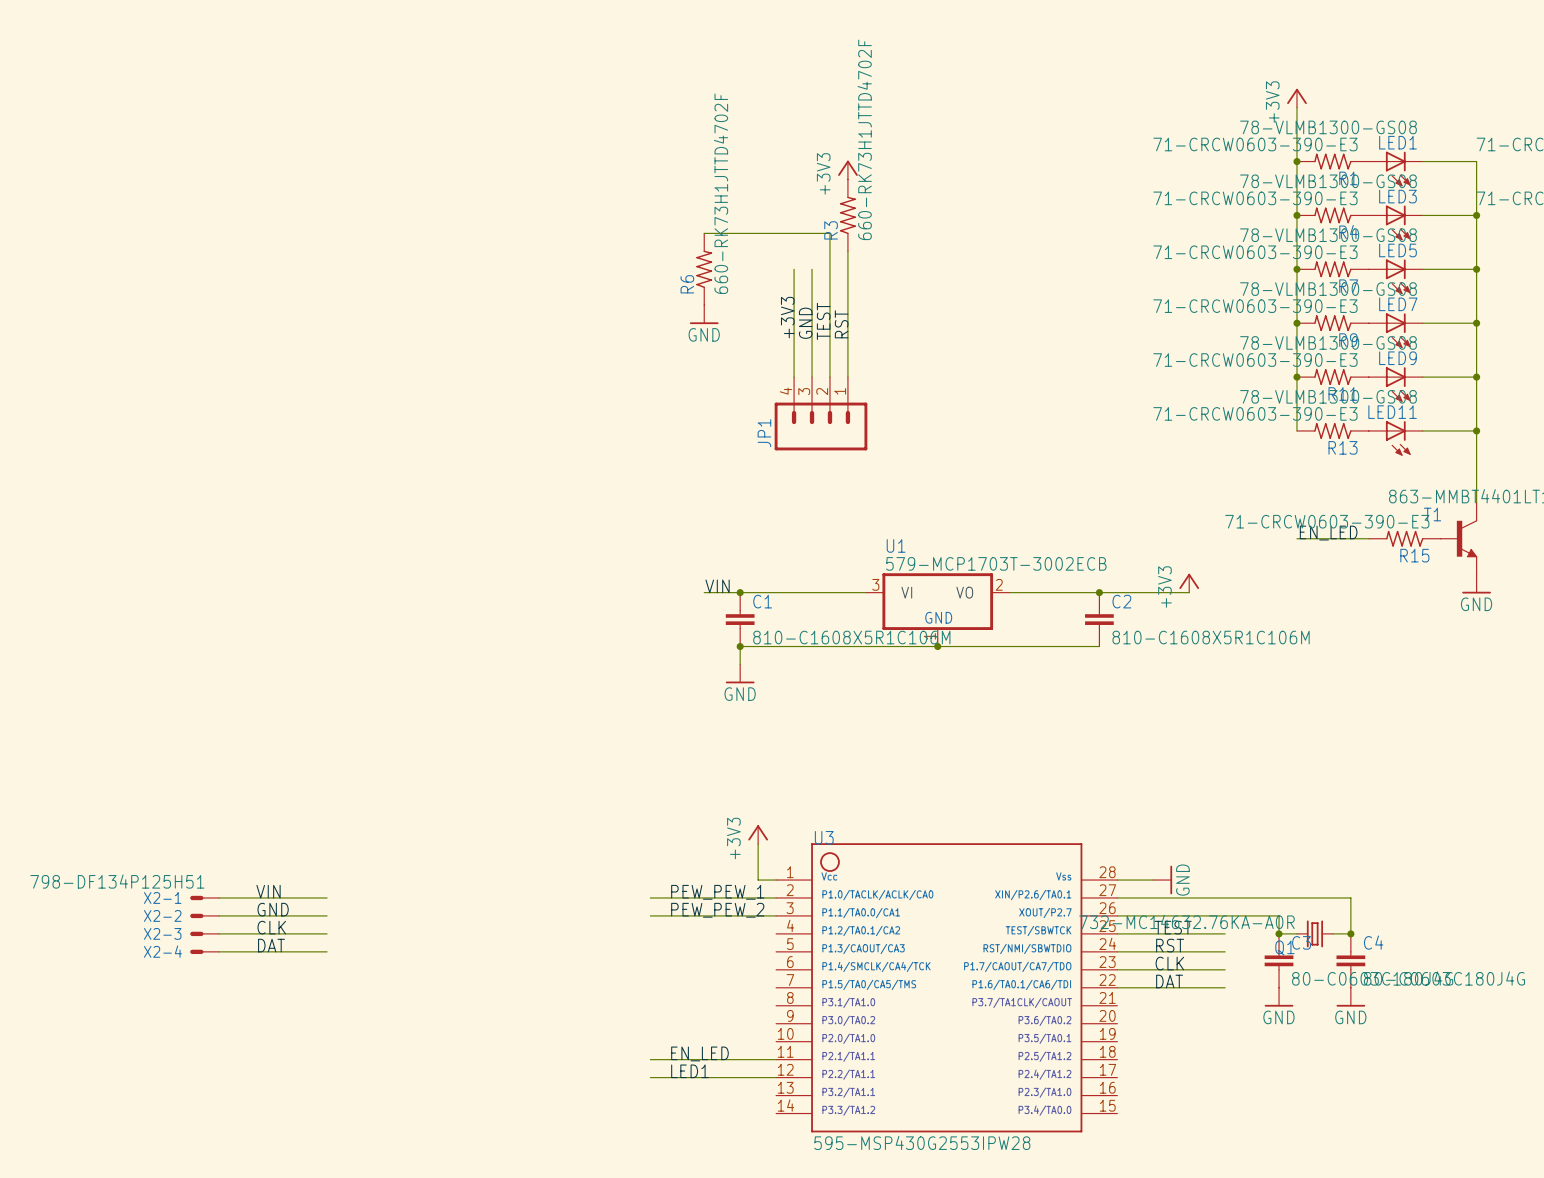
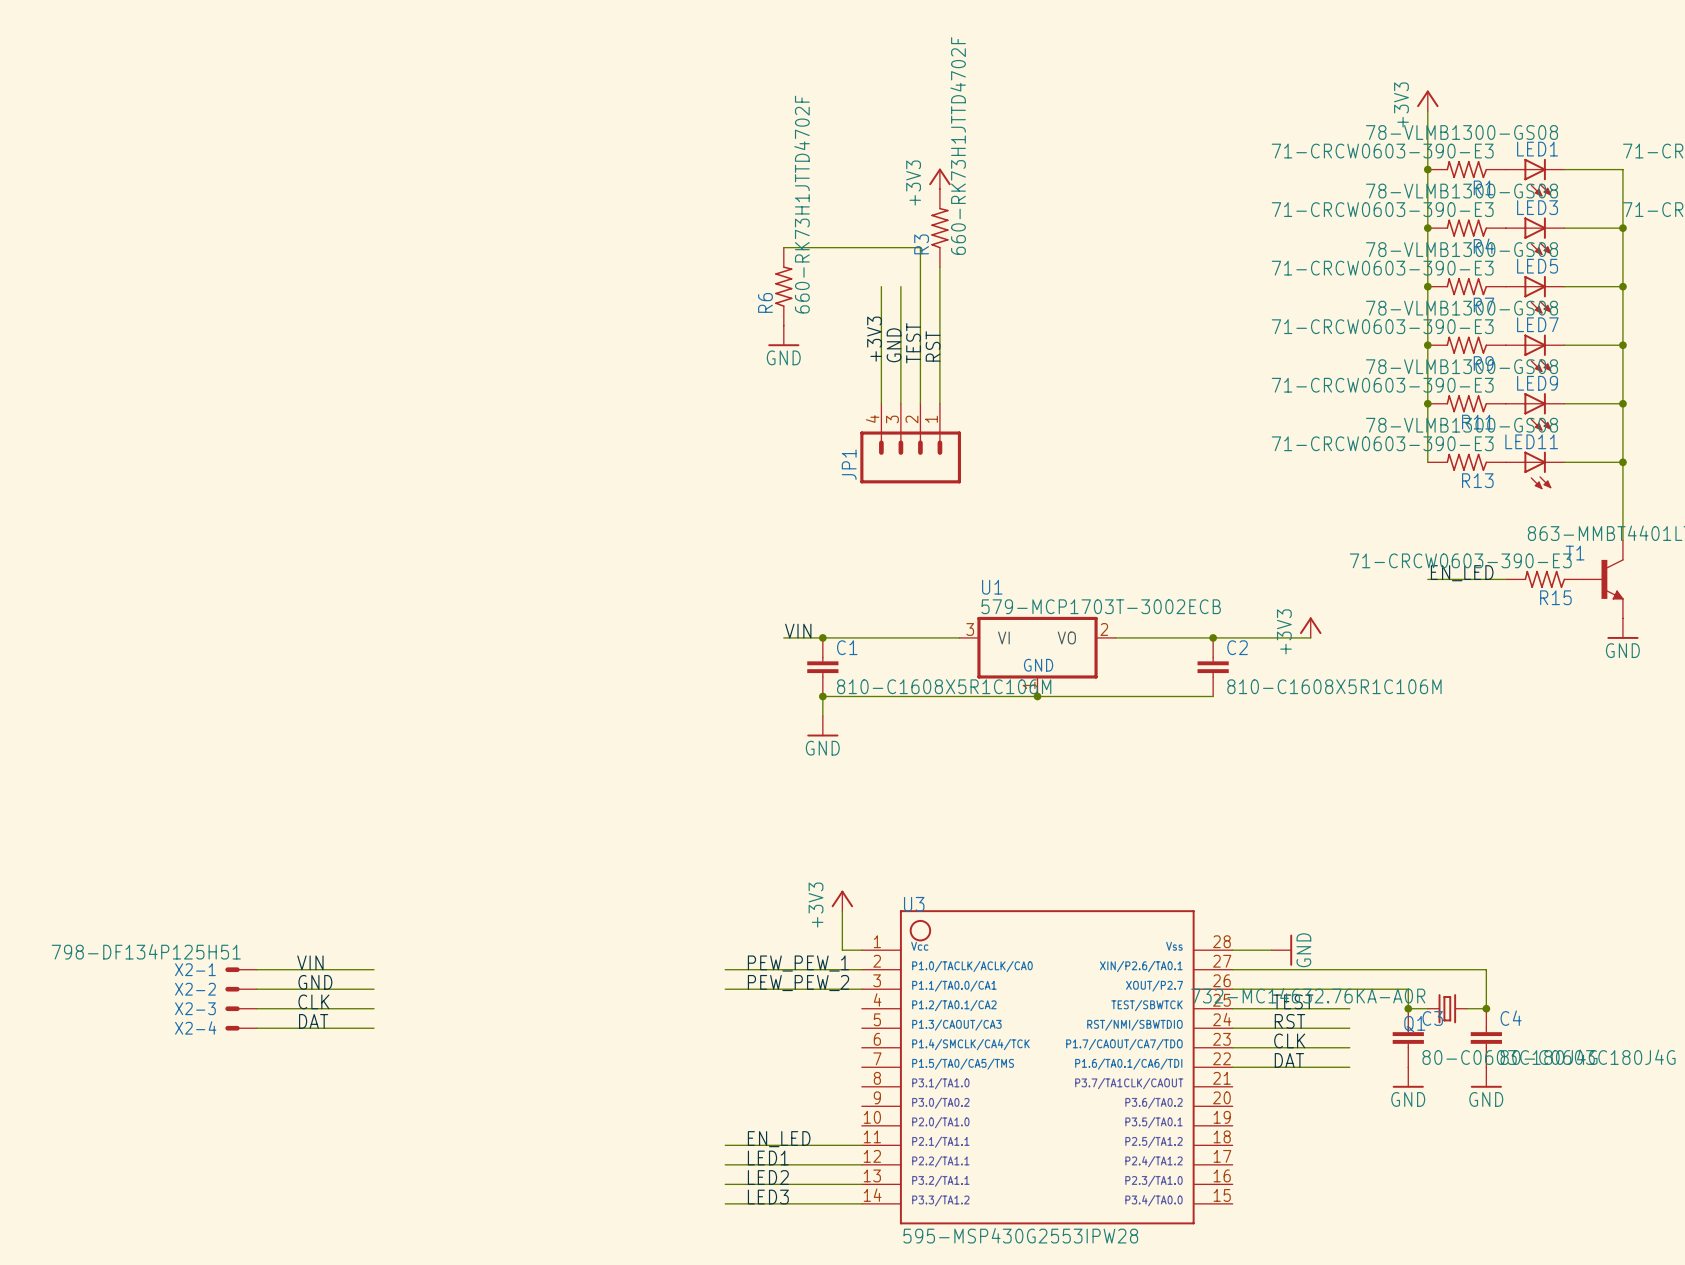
label: none -> LED2 (768, 1177)
wire: none -> (725, 1184) (861, 1184)
label: none -> LED3 (768, 1197)
wire: none -> (725, 1203) (861, 1203)

